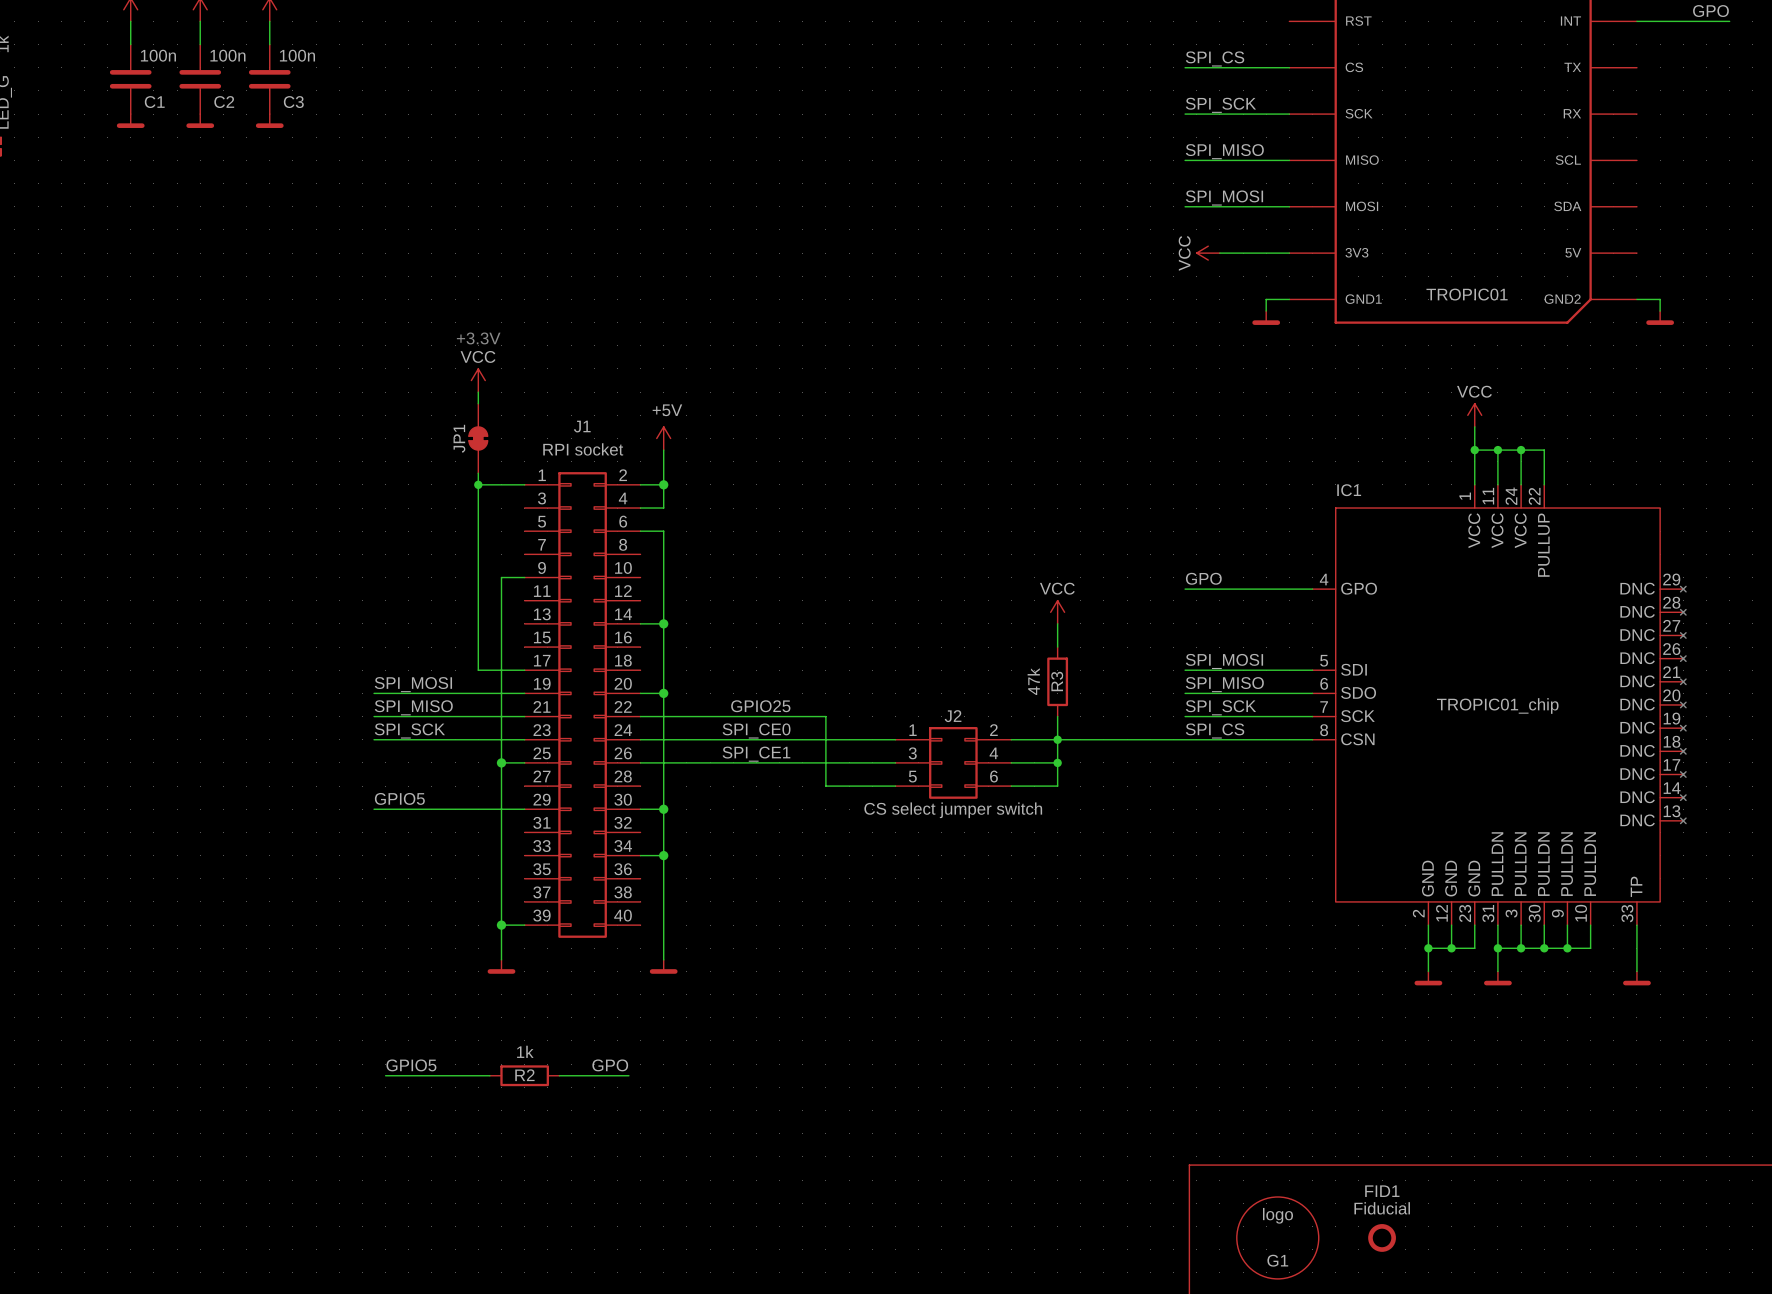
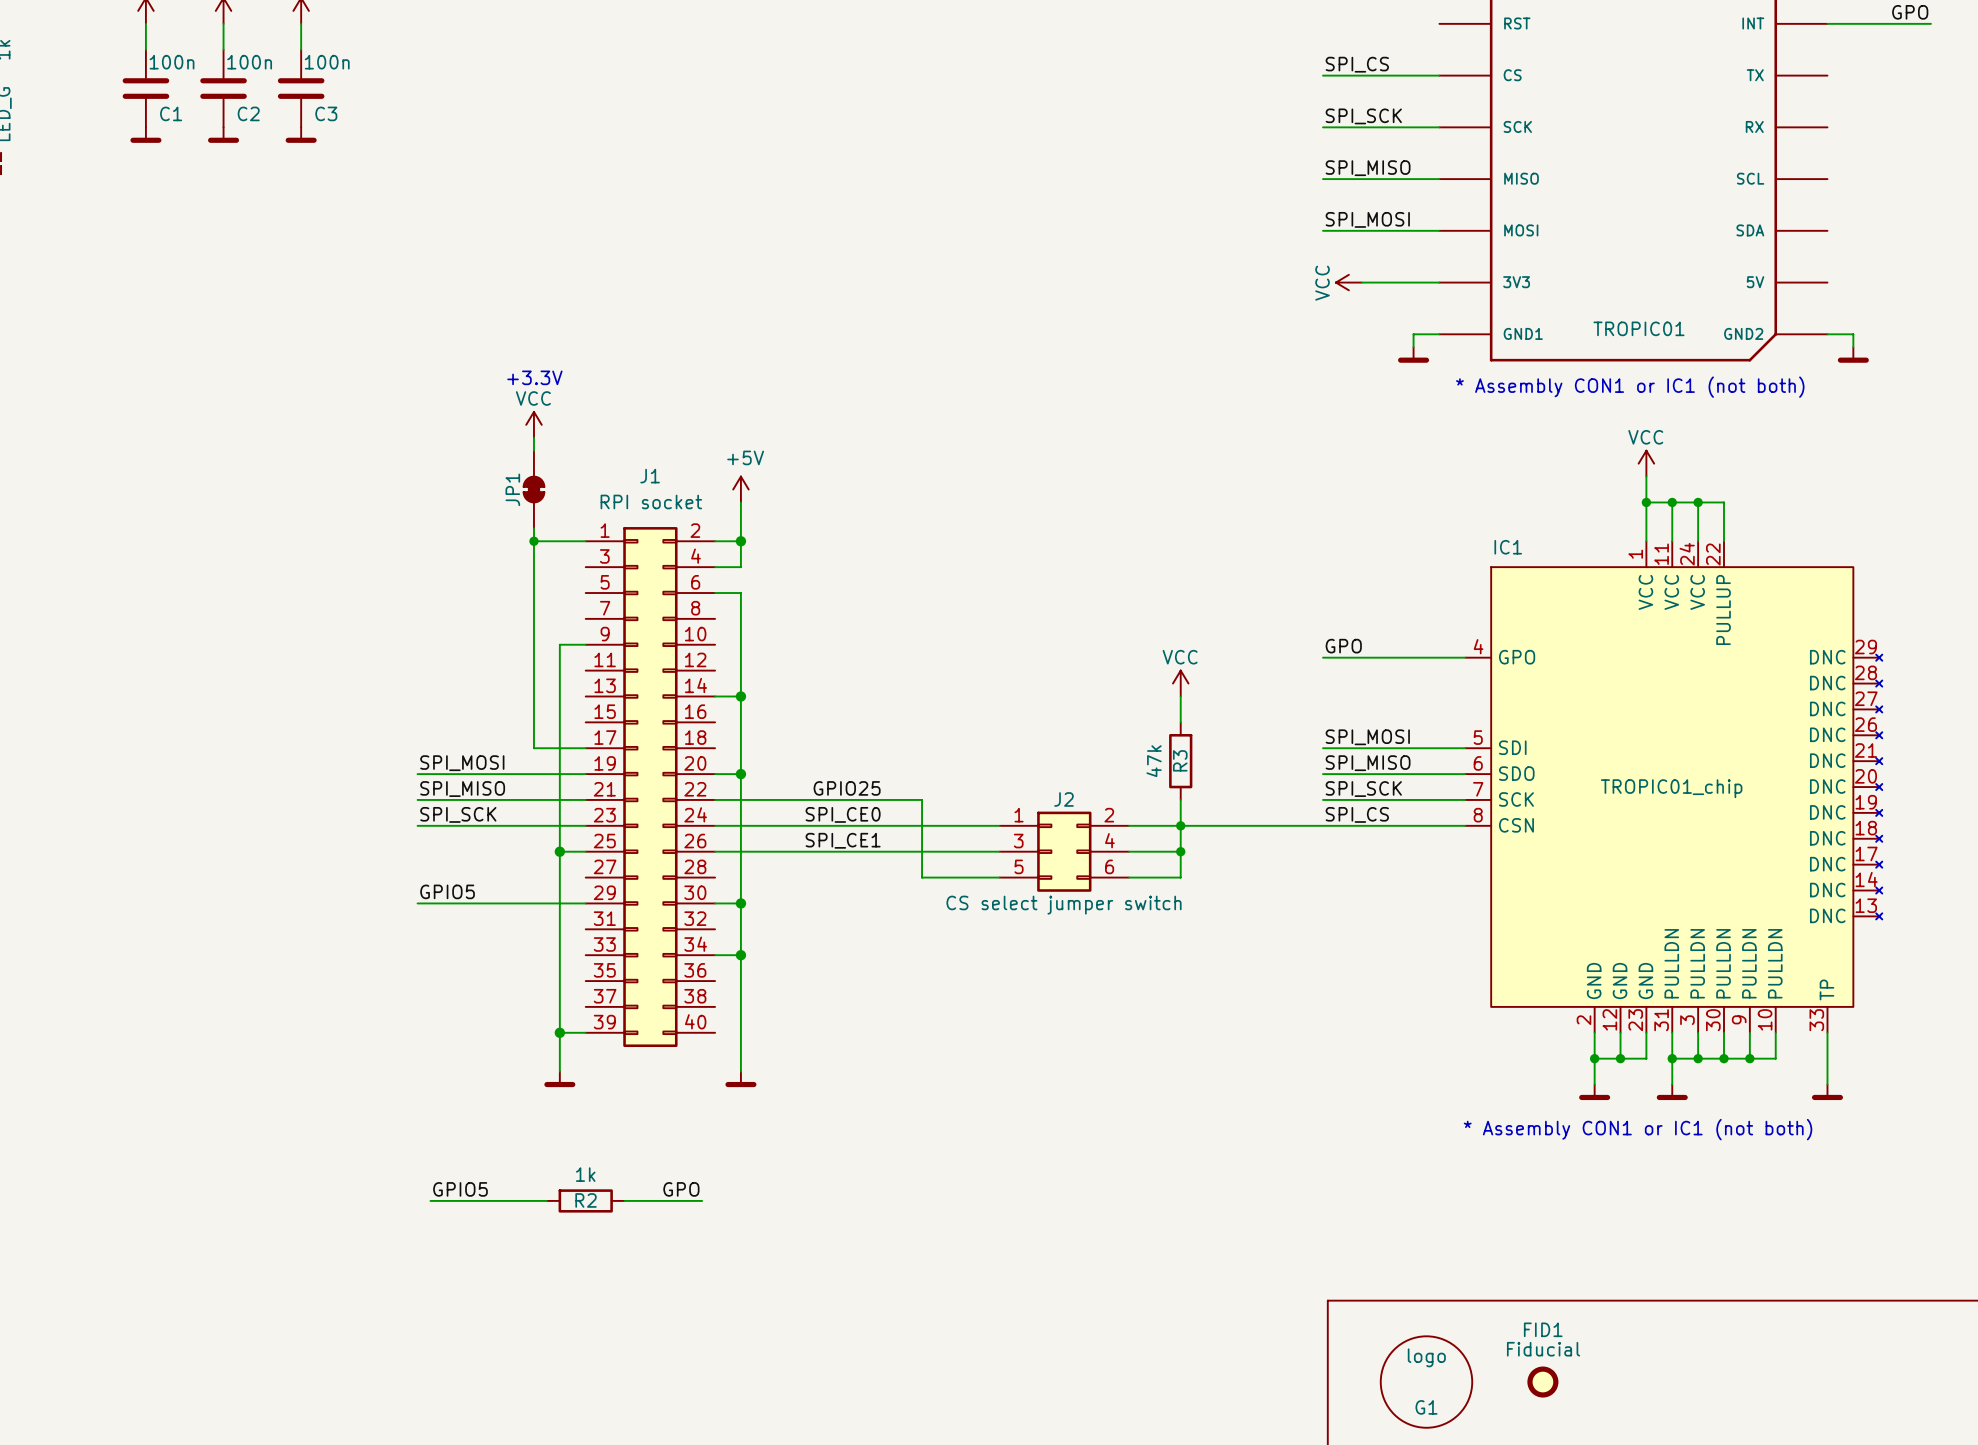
text: none -> * Assembly CON1 or IC1 (not both) (1630, 387)
text: none -> * Assembly CON1 or IC1 (not both) (1638, 1129)

